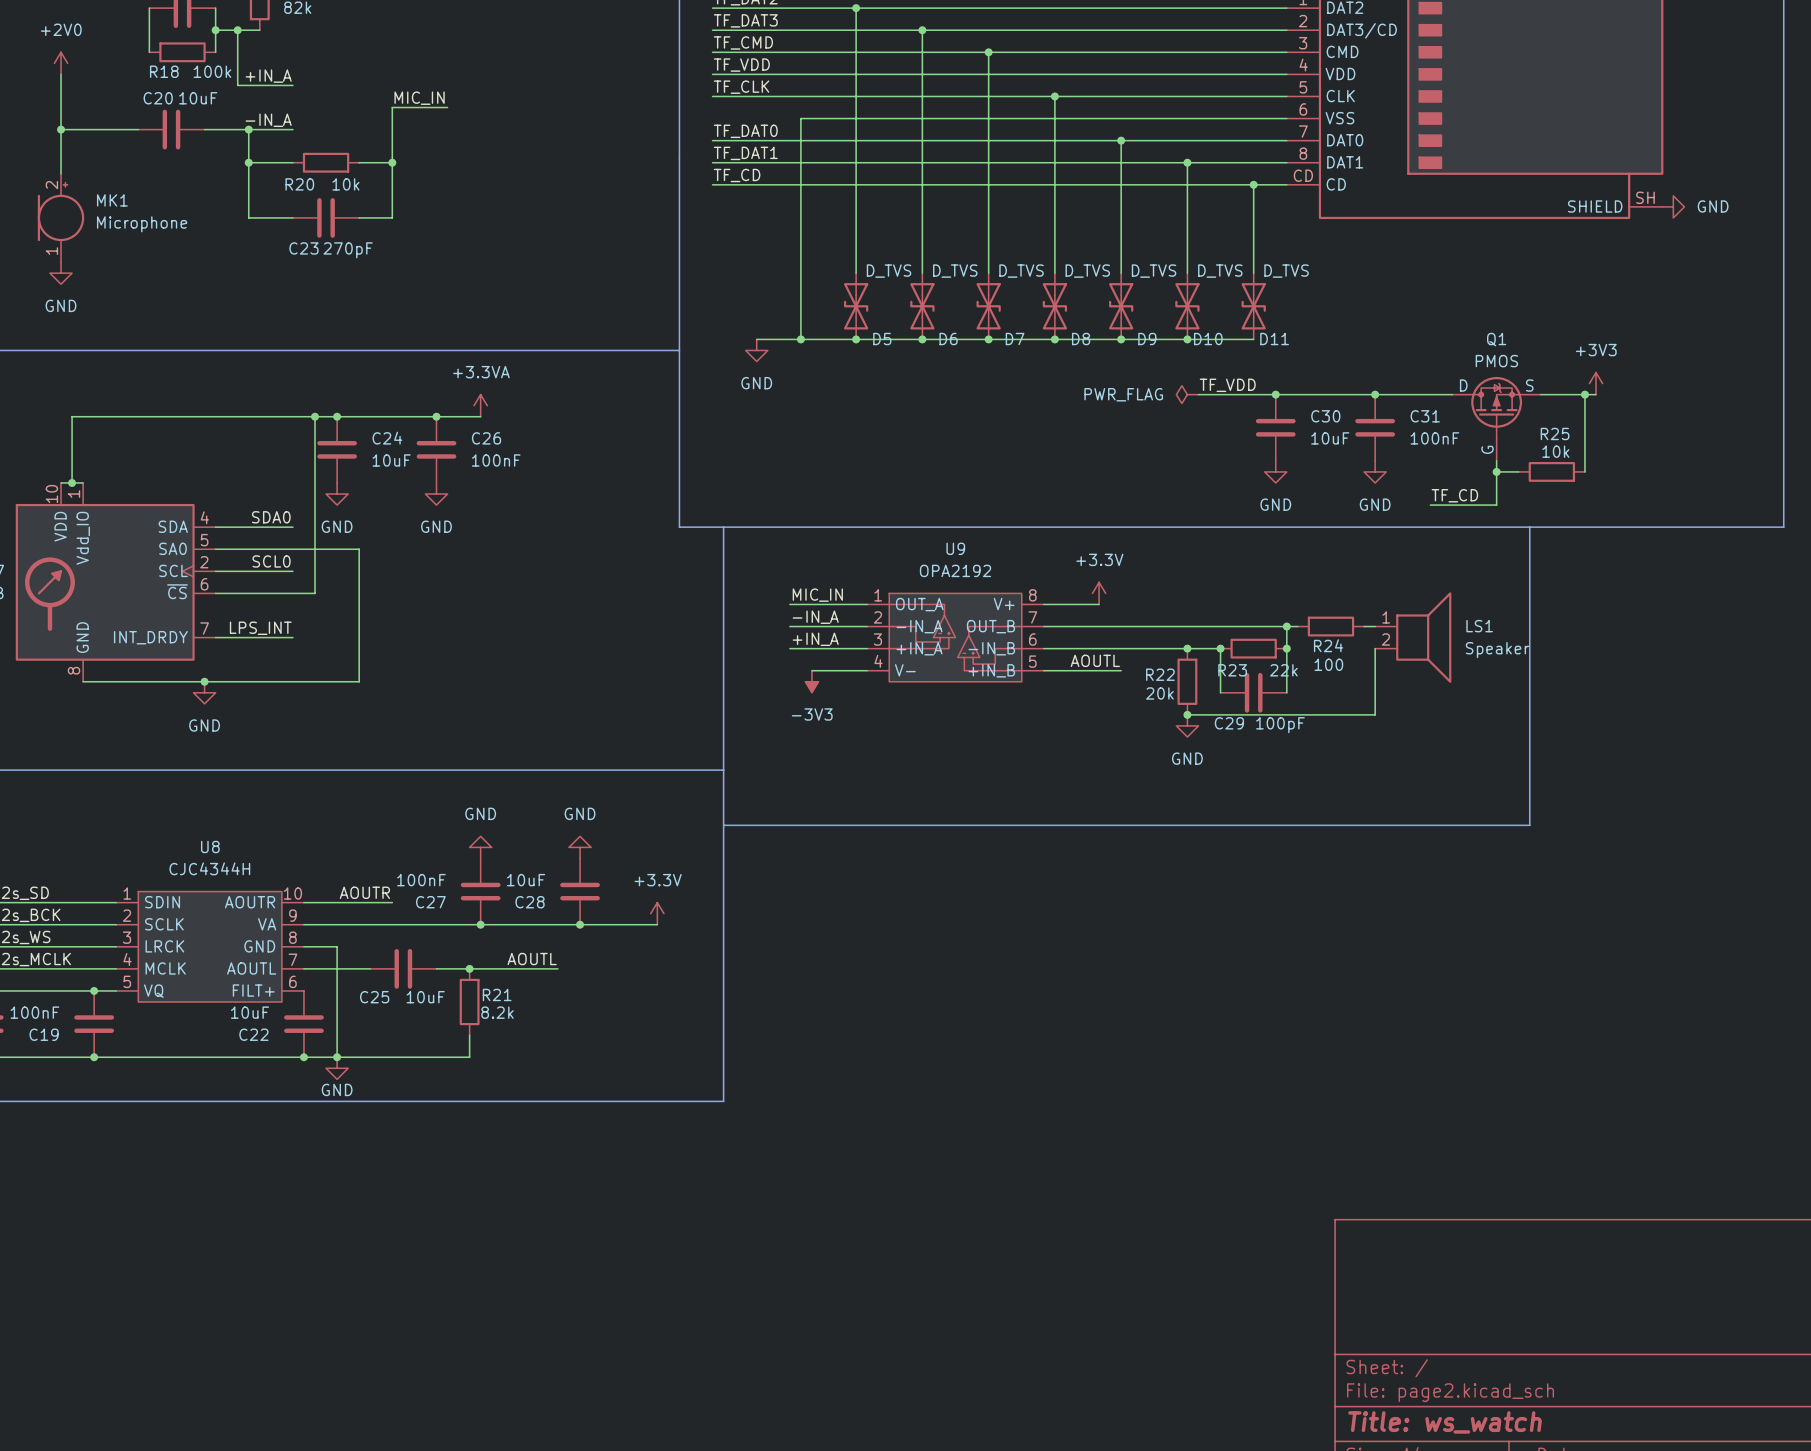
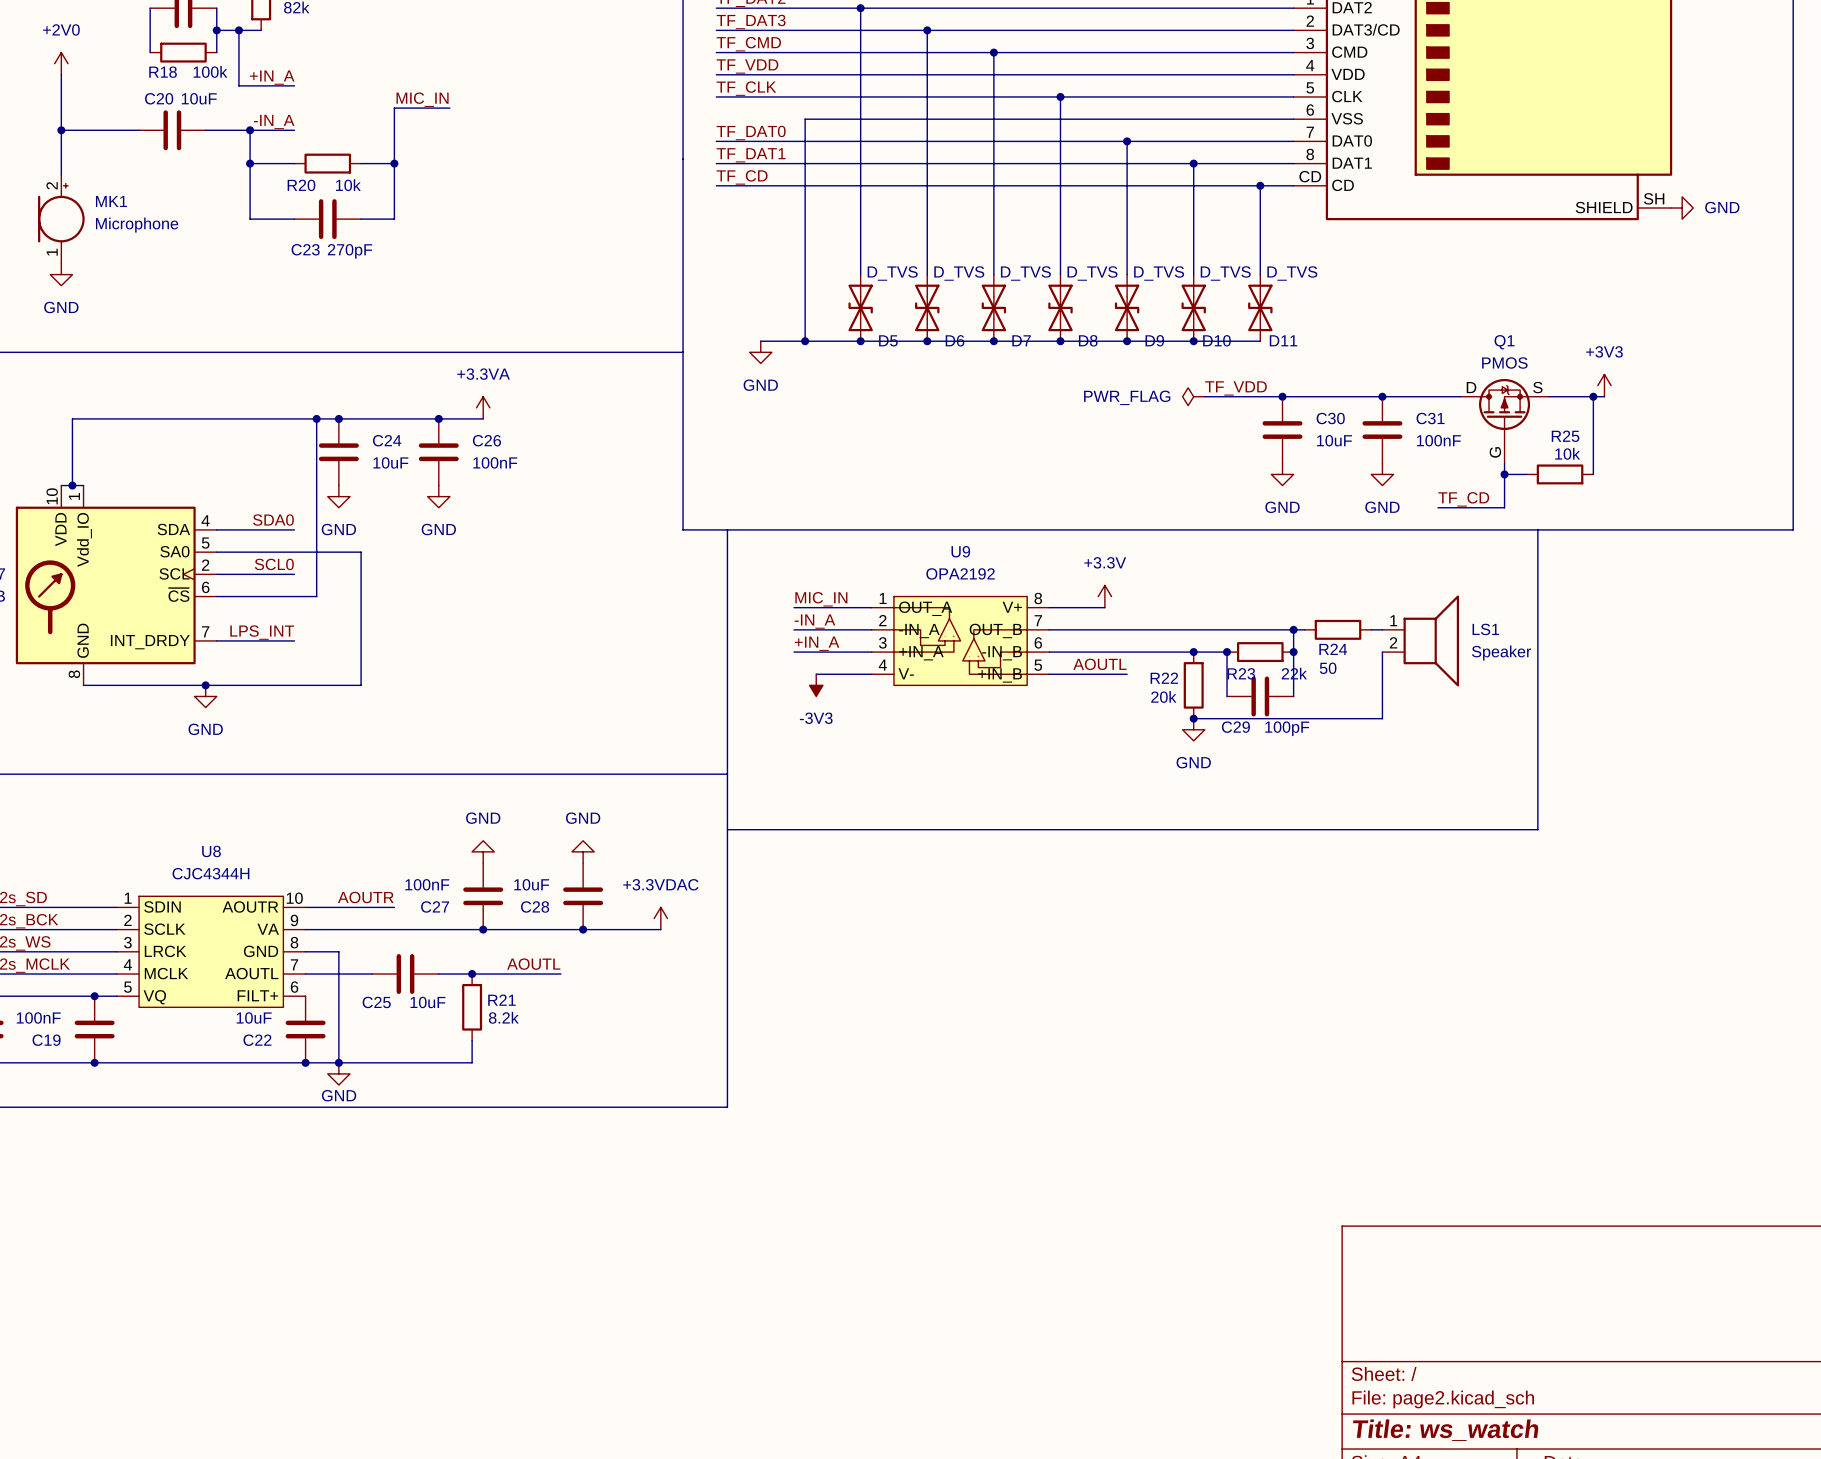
R24 value: 100 (1328, 664) -> 50 (1328, 668)
power symbol: +3.3V (657, 913) -> +3.3VDAC (660, 918)

